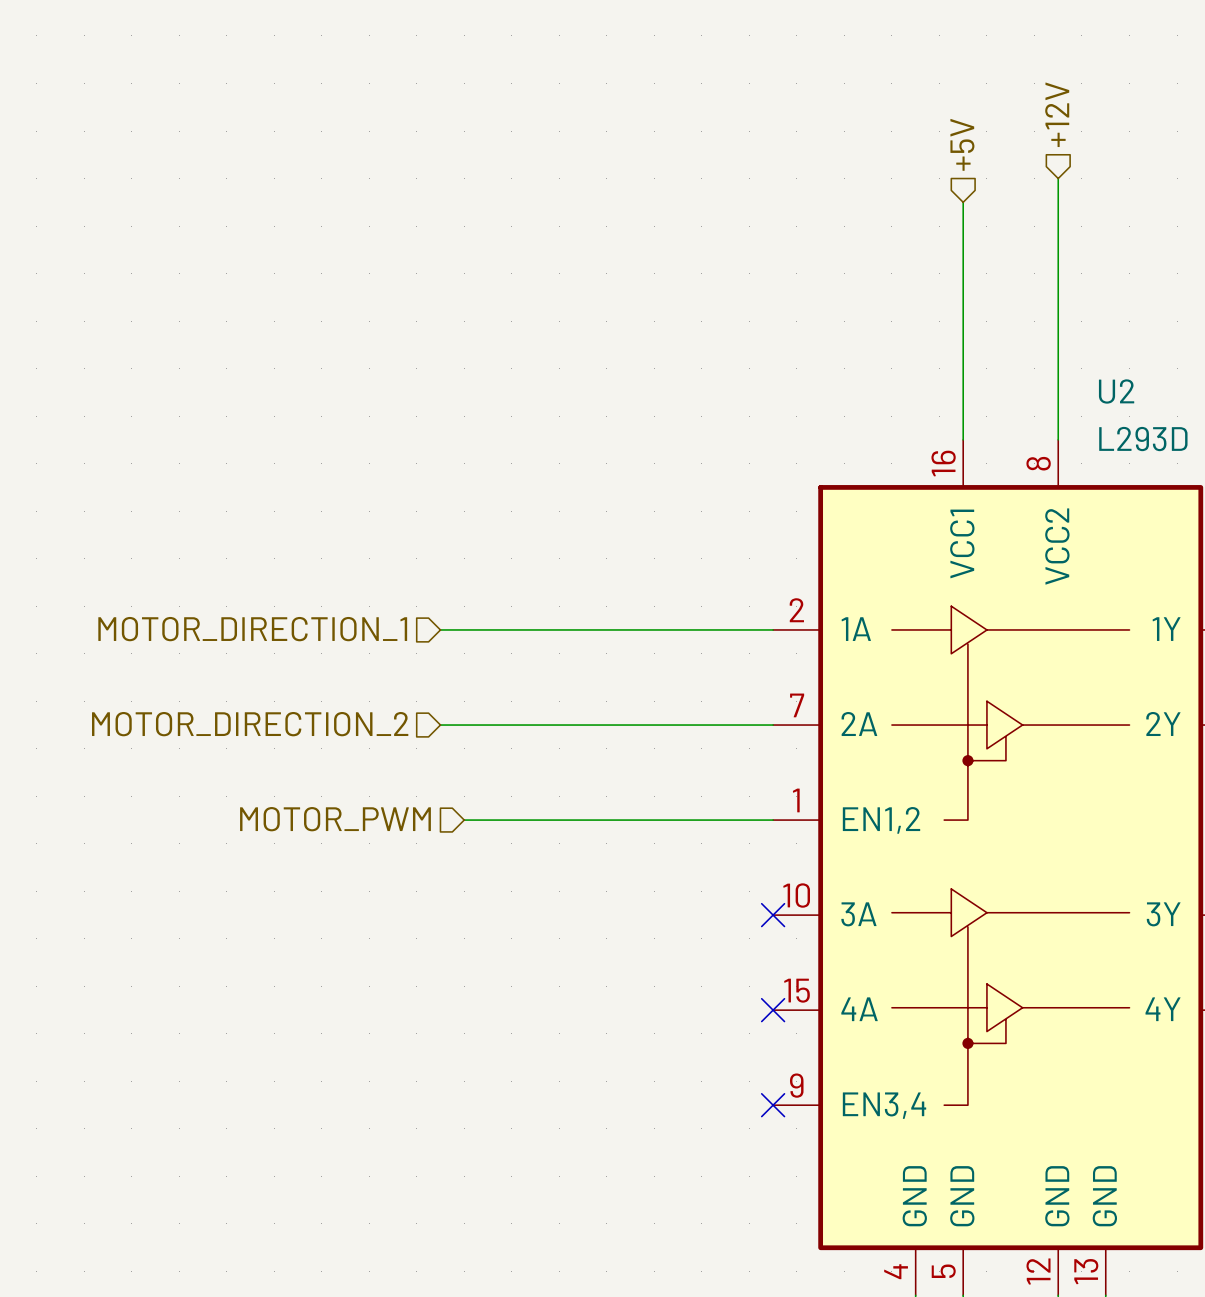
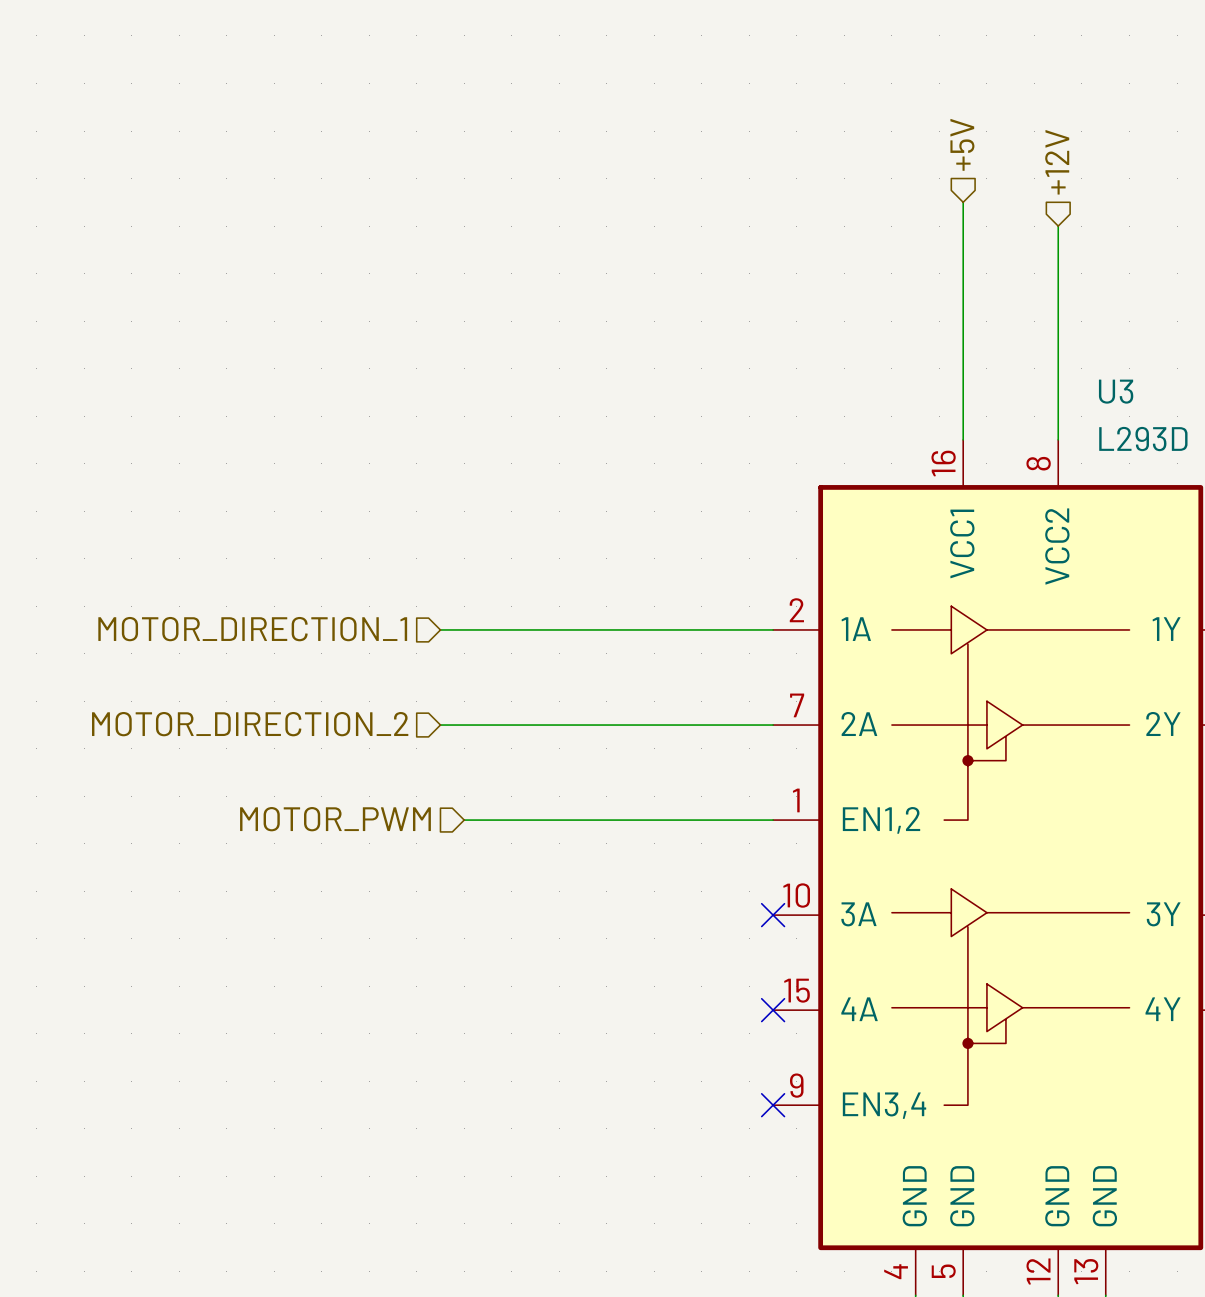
hierarchical label position: +12V (1057, 114) -> +12V (1057, 162)
wire: (1058, 178) (1058, 226) -> none
U2 name: U2 (1116, 391) -> U3 (1116, 391)

